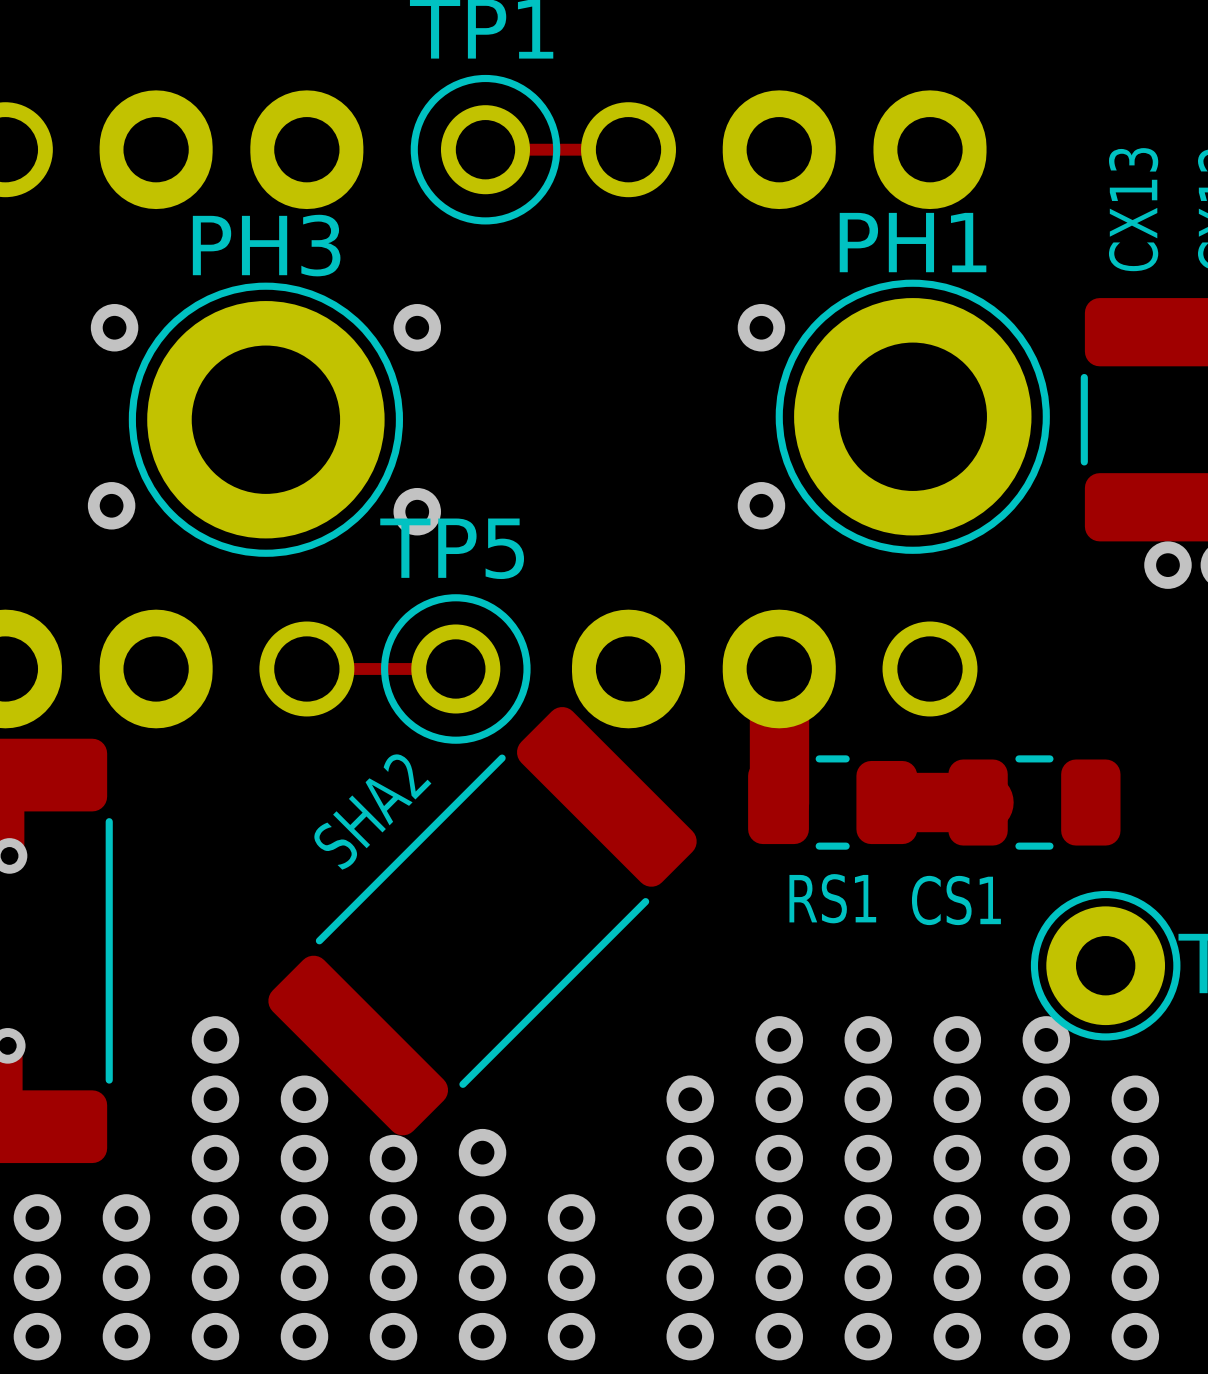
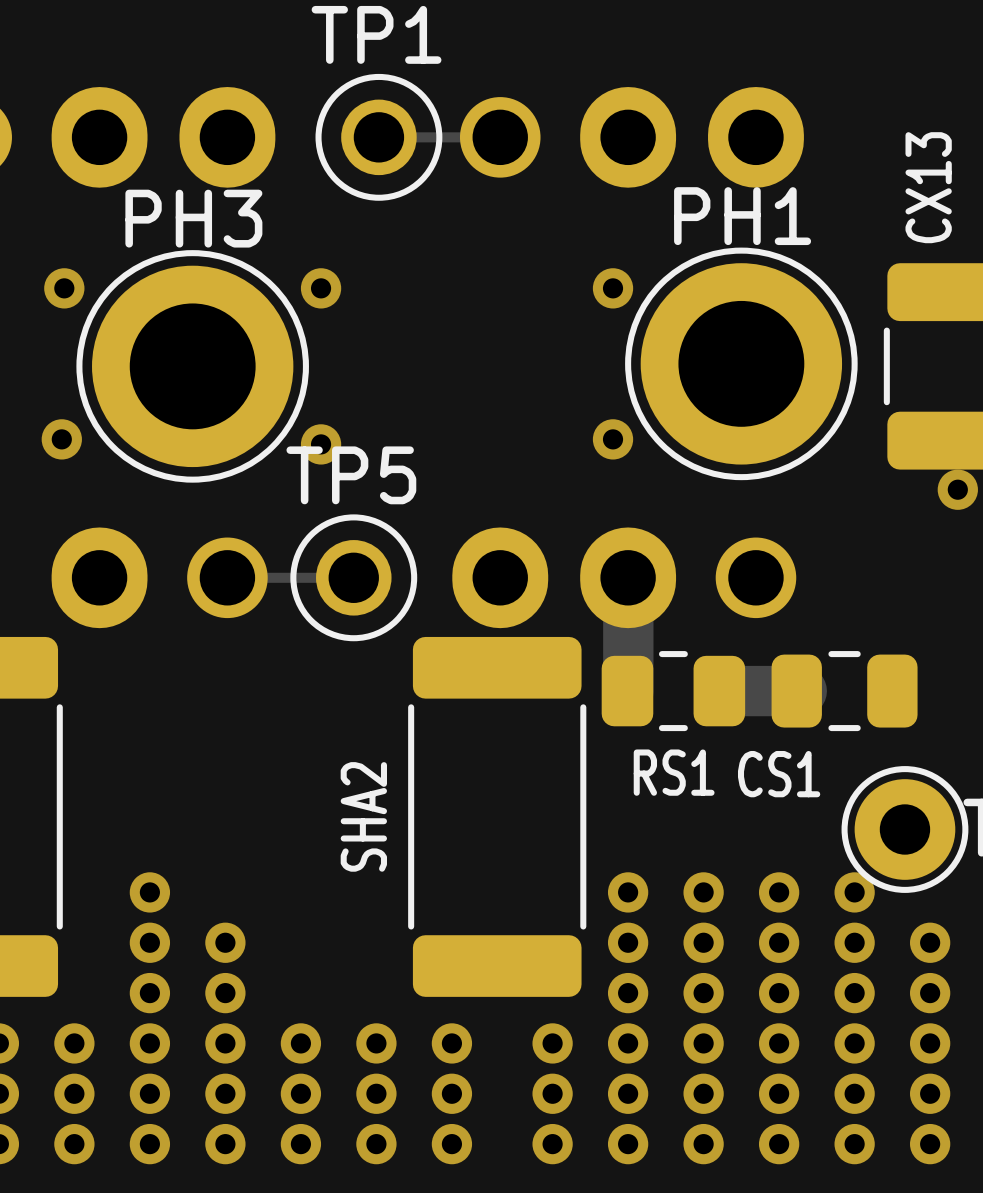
SHA2 rotation: 0° (482, 921) -> 45° counterclockwise (497, 816)
via: (690, 1099) -> none
via: (482, 1152) -> none
via: (393, 1158) -> none
via: (690, 1158) -> none

